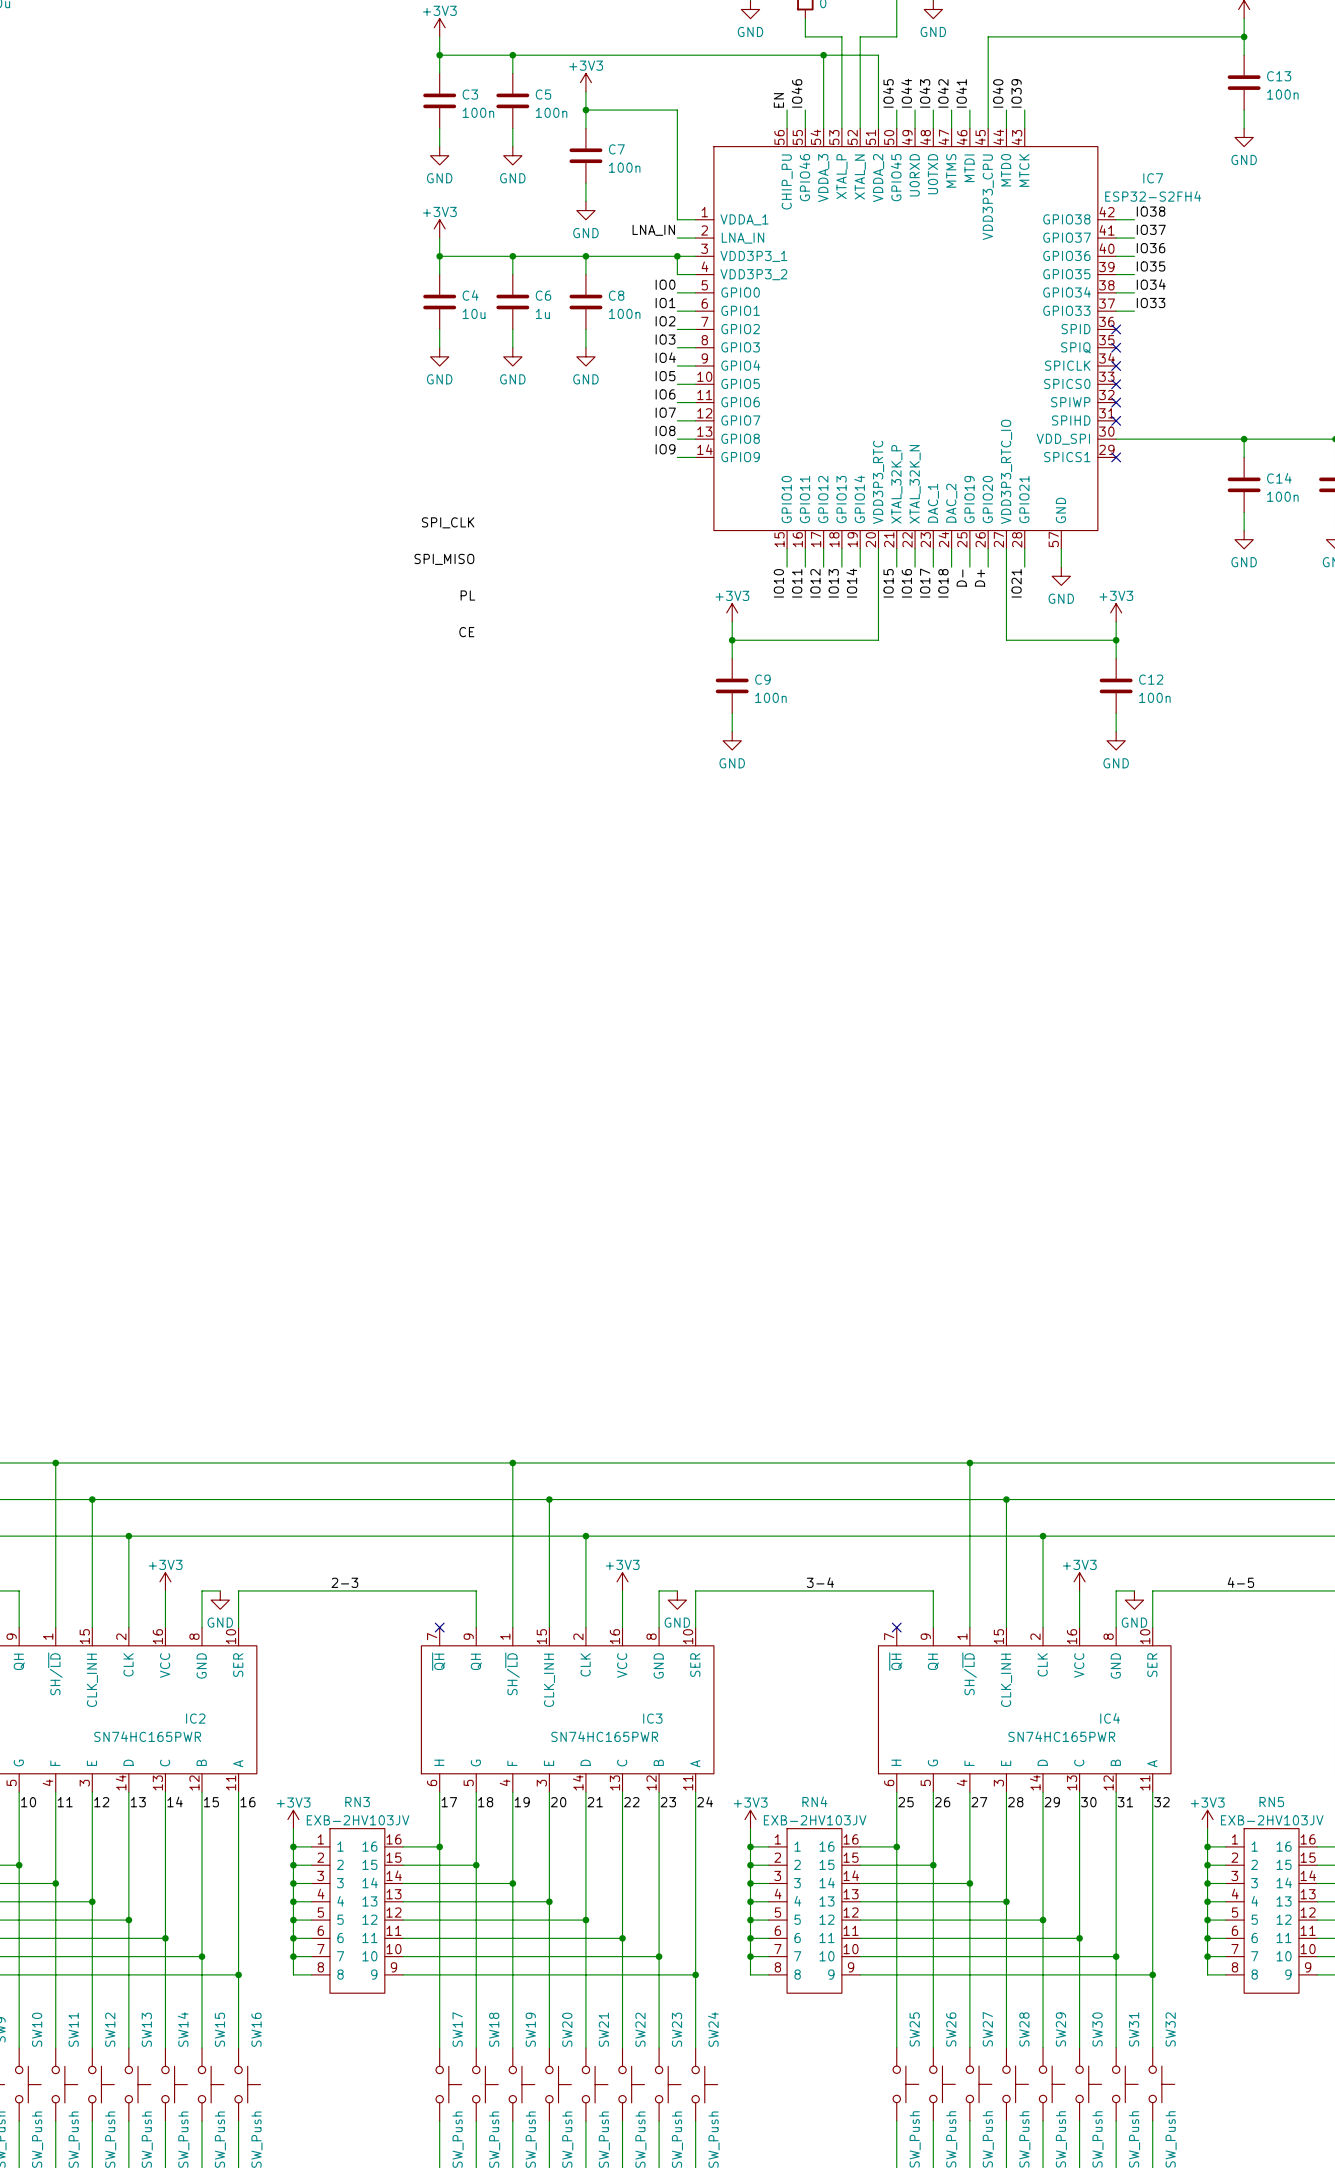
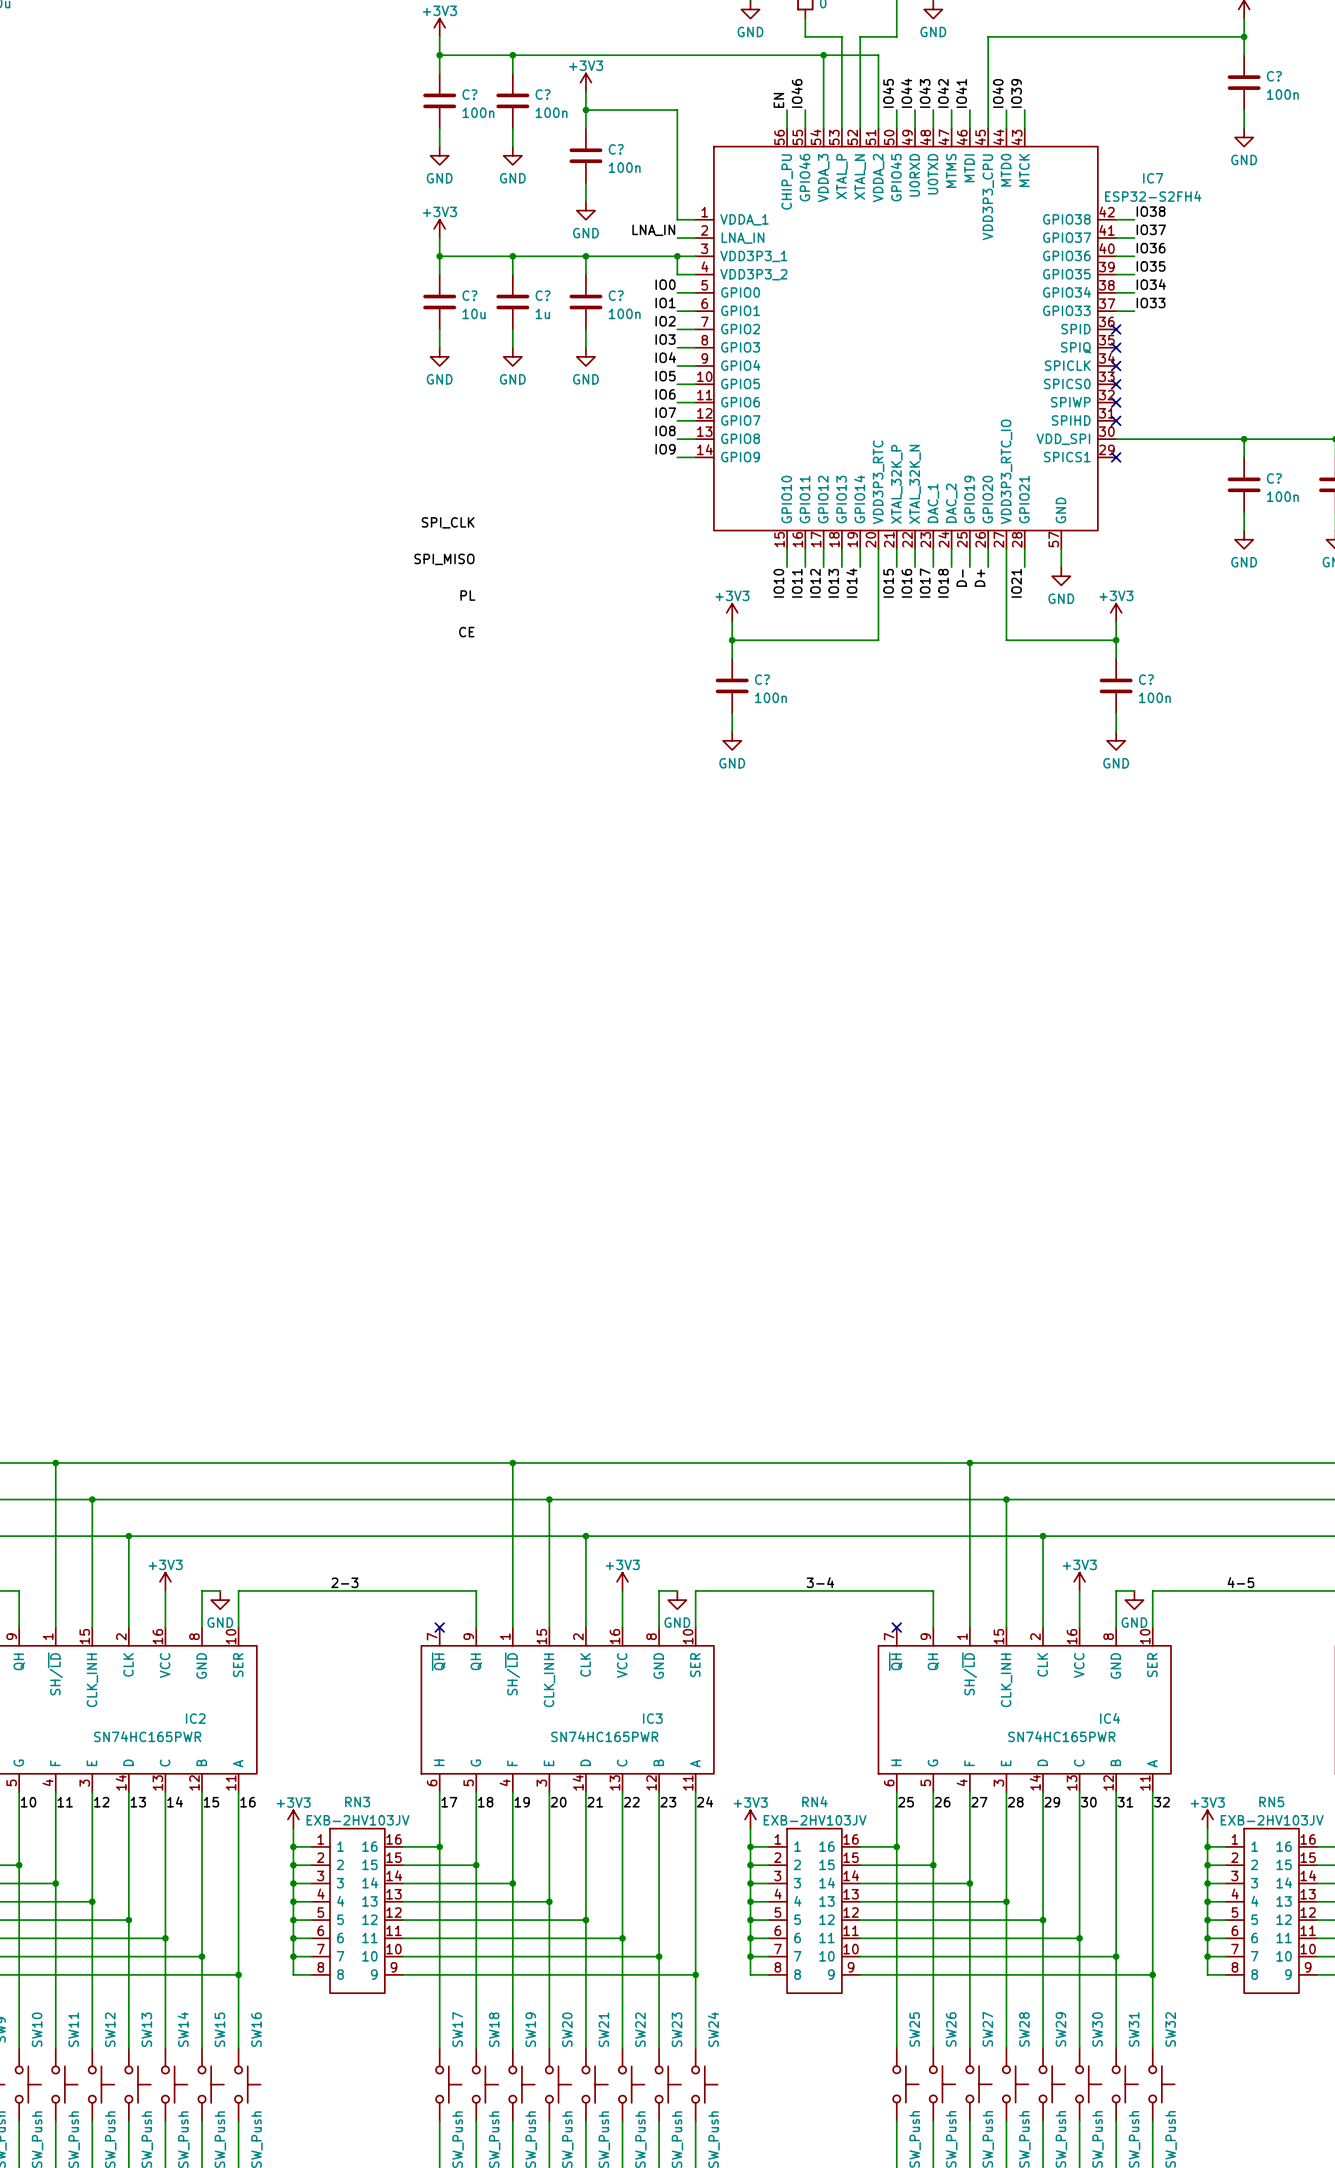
C13 name: C13 (1279, 76) -> C? (1274, 76)
C3 name: C3 (470, 94) -> C? (469, 94)
C5 name: C5 (543, 94) -> C? (543, 94)
C7 name: C7 (616, 149) -> C? (616, 149)
C4 name: C4 (470, 295) -> C? (469, 295)
C6 name: C6 (543, 295) -> C? (543, 295)
C8 name: C8 (616, 295) -> C? (616, 295)
C14 name: C14 (1279, 478) -> C? (1274, 478)
C9 name: C9 (762, 679) -> C? (762, 679)
C12 name: C12 (1151, 679) -> C? (1146, 679)

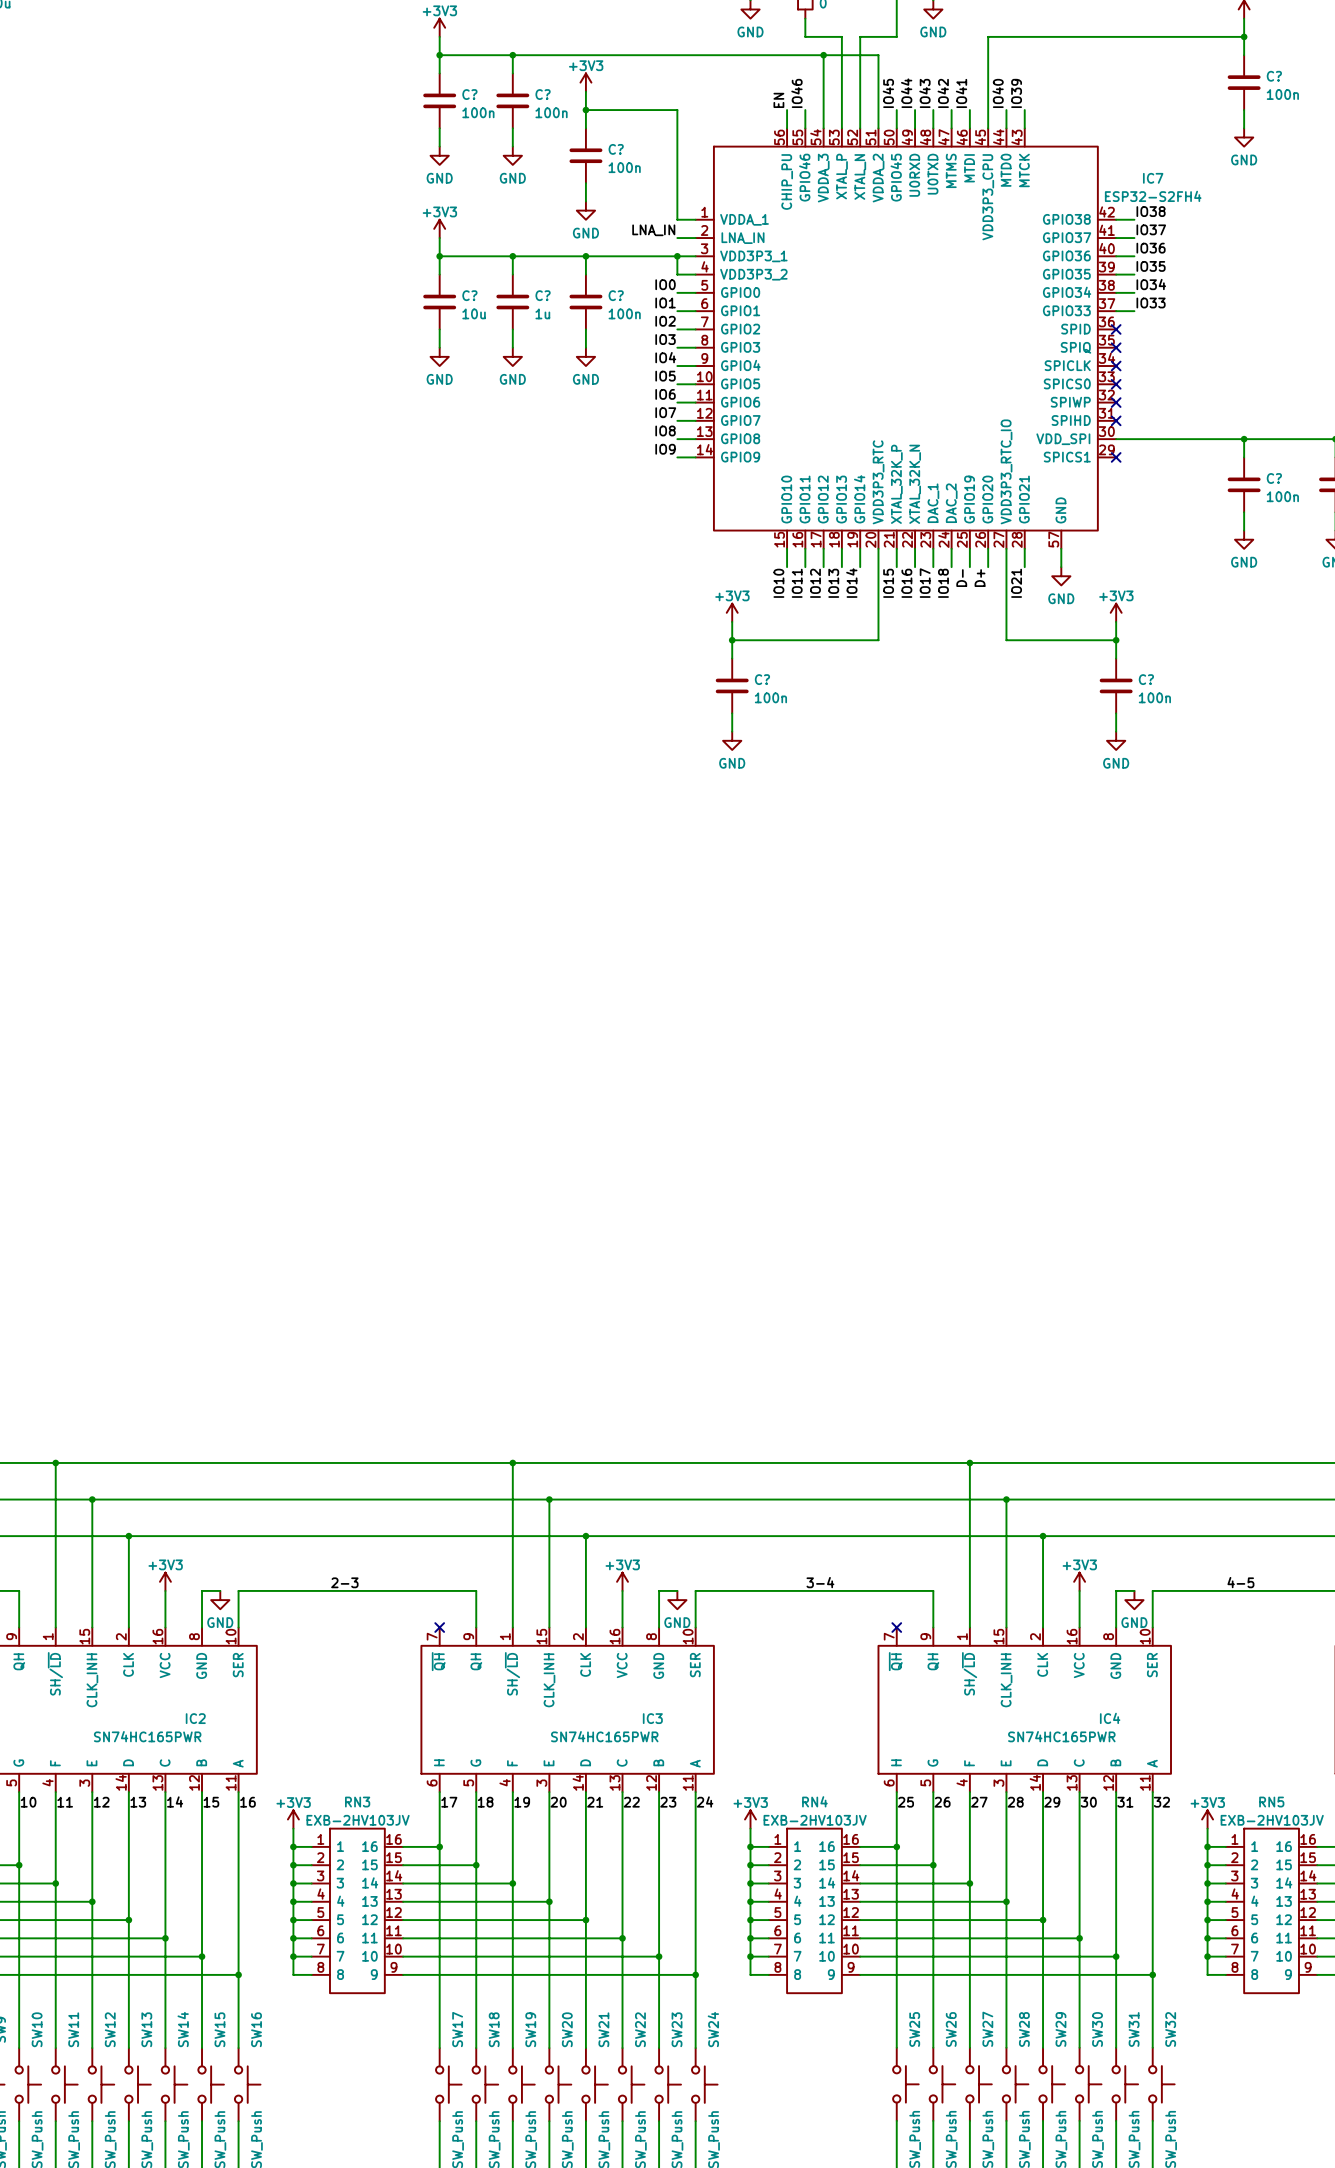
label: SPI_CLK (448, 522) -> none
label: SPI_MISO (444, 559) -> none
label: PL (467, 595) -> none
label: CE (466, 632) -> none

